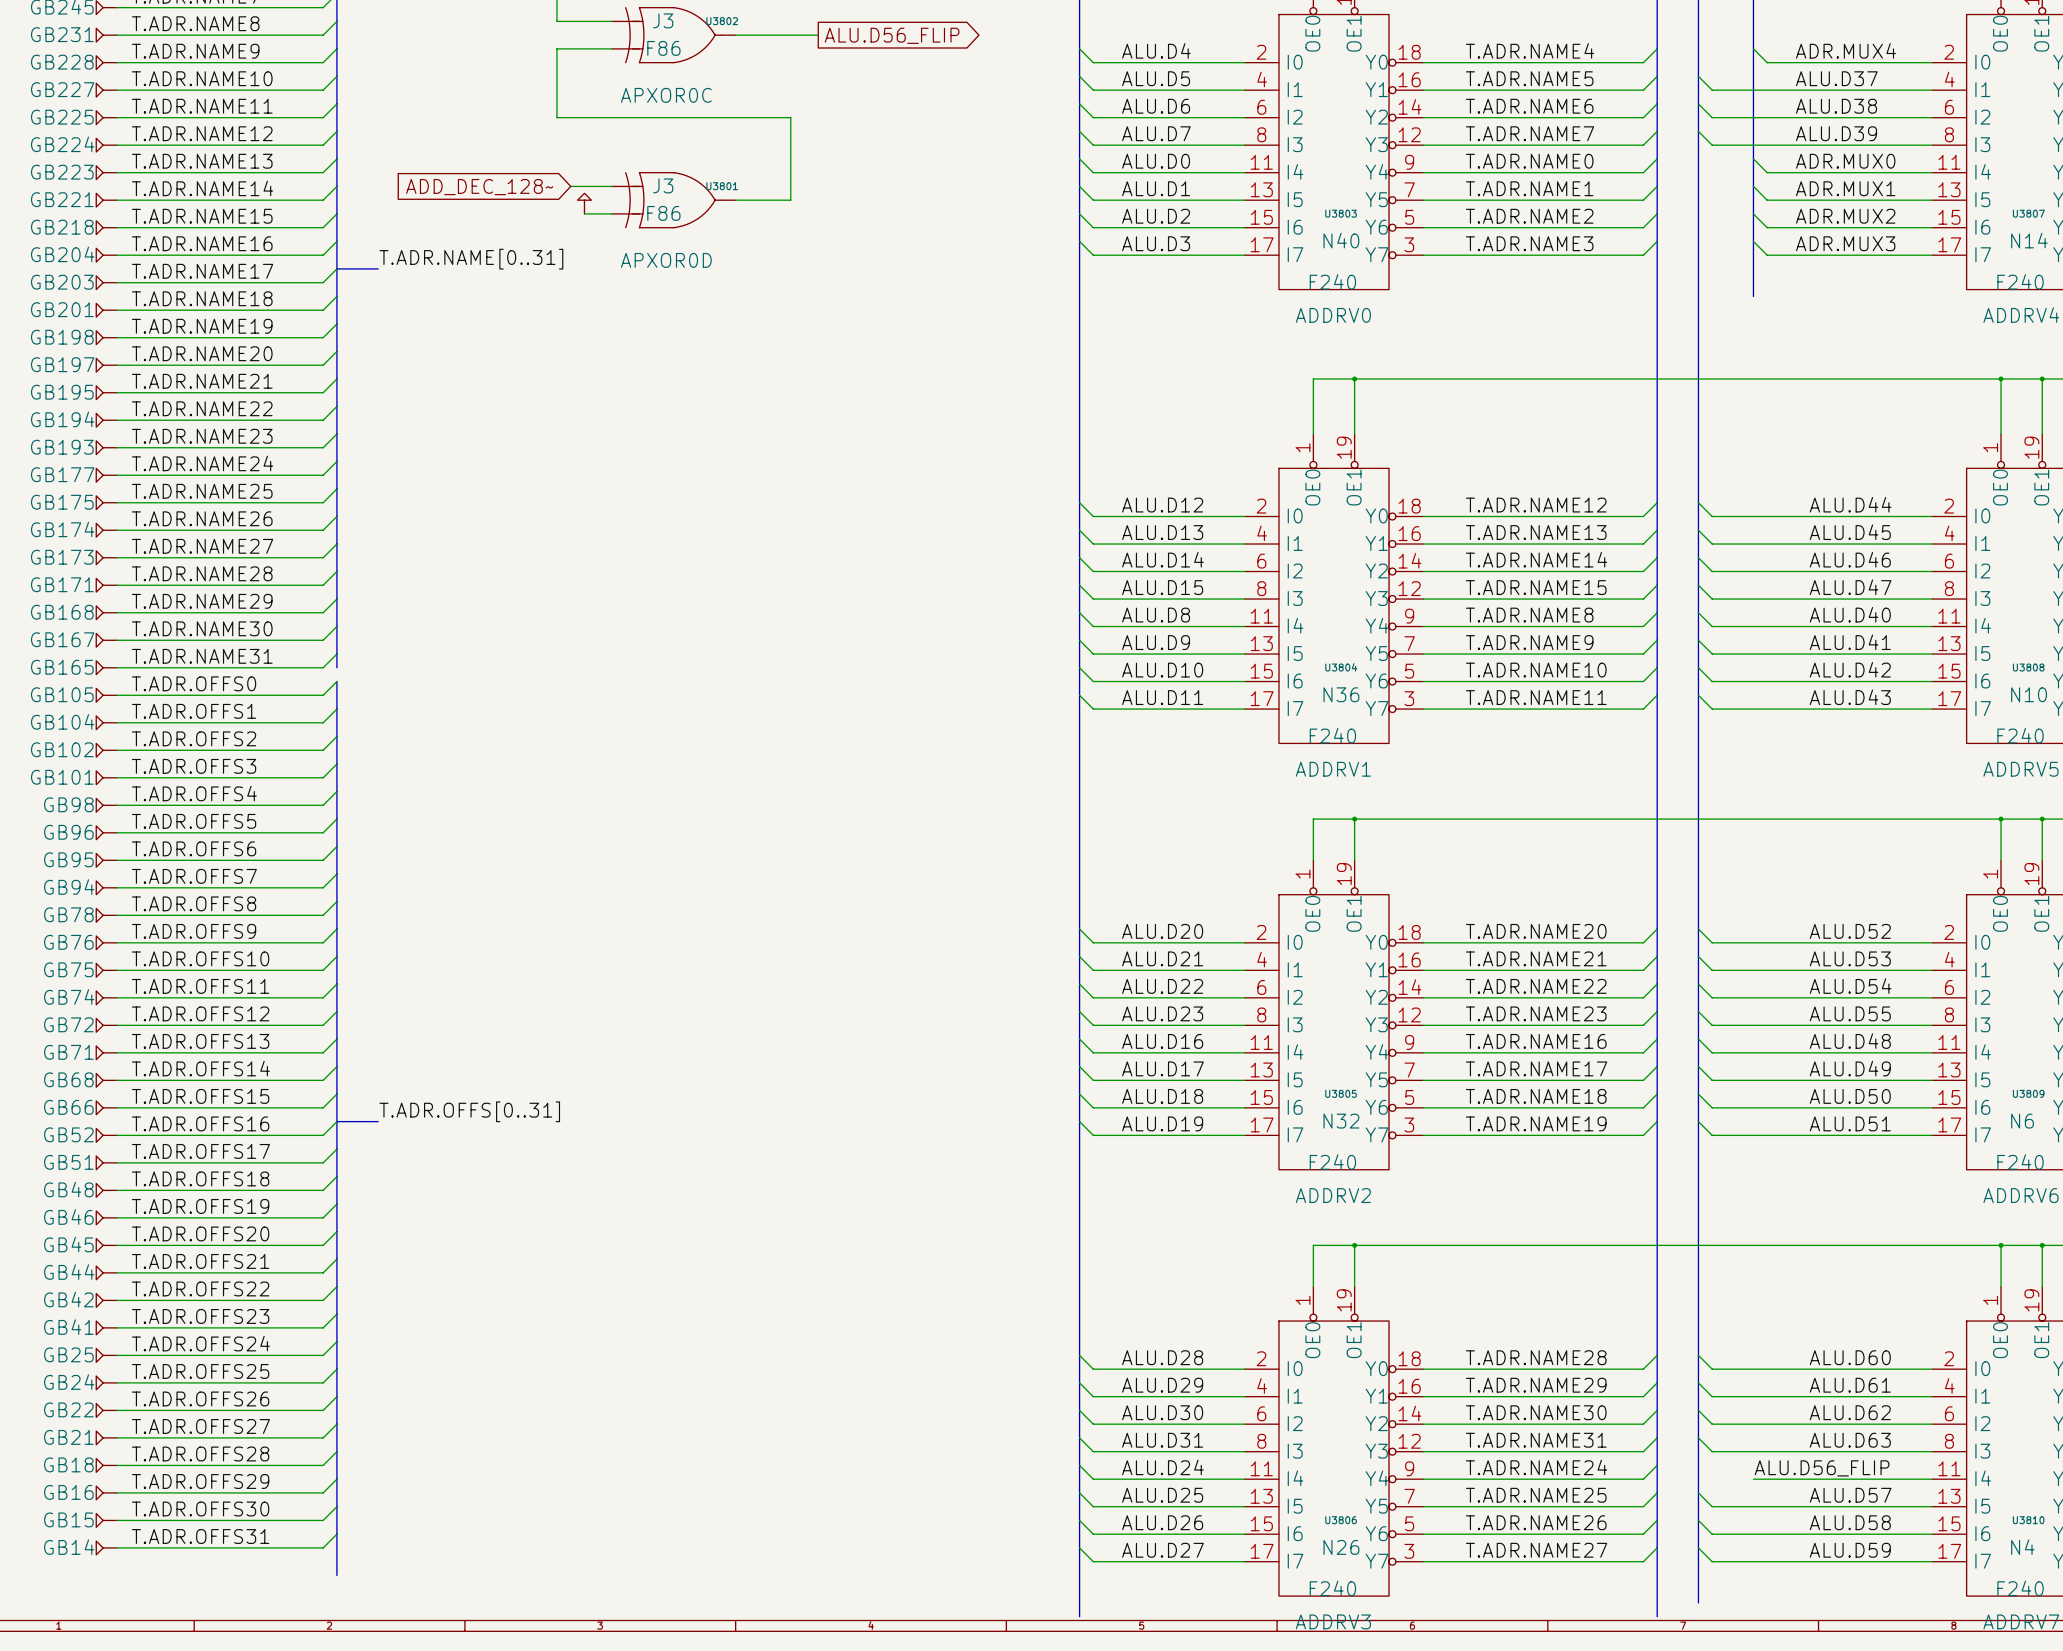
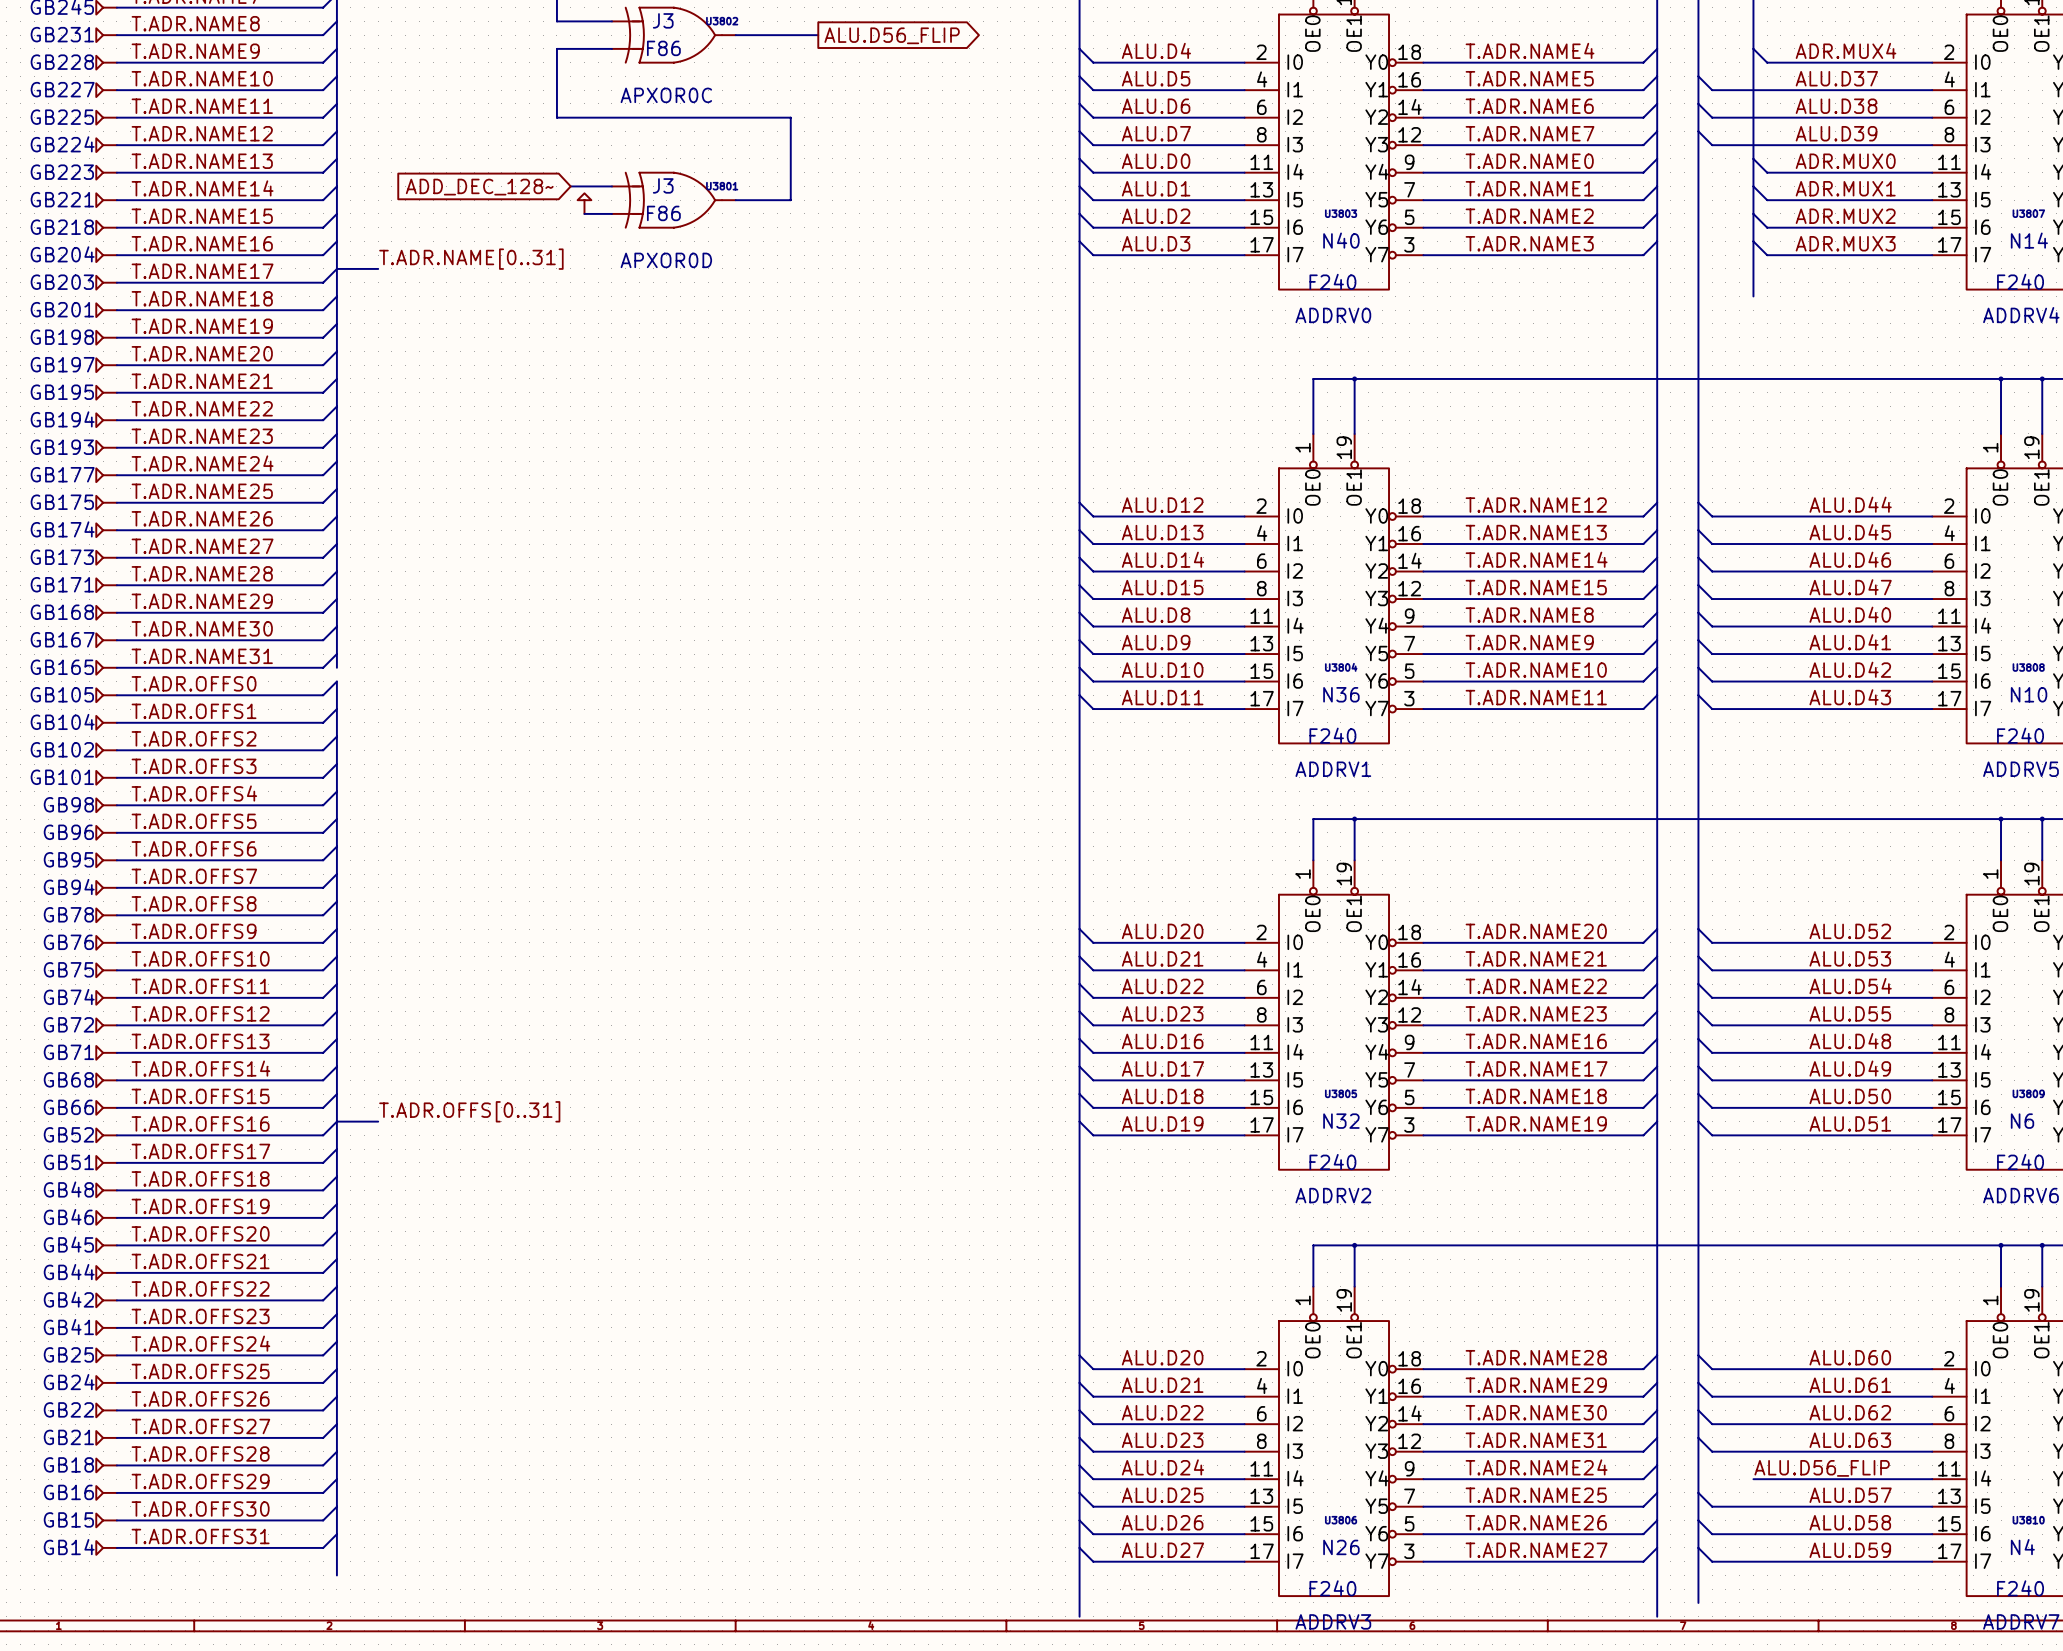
label: ALU.D28 (1162, 1357) -> ALU.D20 (1162, 1357)
label: ALU.D29 (1162, 1385) -> ALU.D21 (1162, 1385)
label: ALU.D30 (1162, 1412) -> ALU.D22 (1162, 1412)
label: ALU.D31 (1162, 1440) -> ALU.D23 (1162, 1440)

